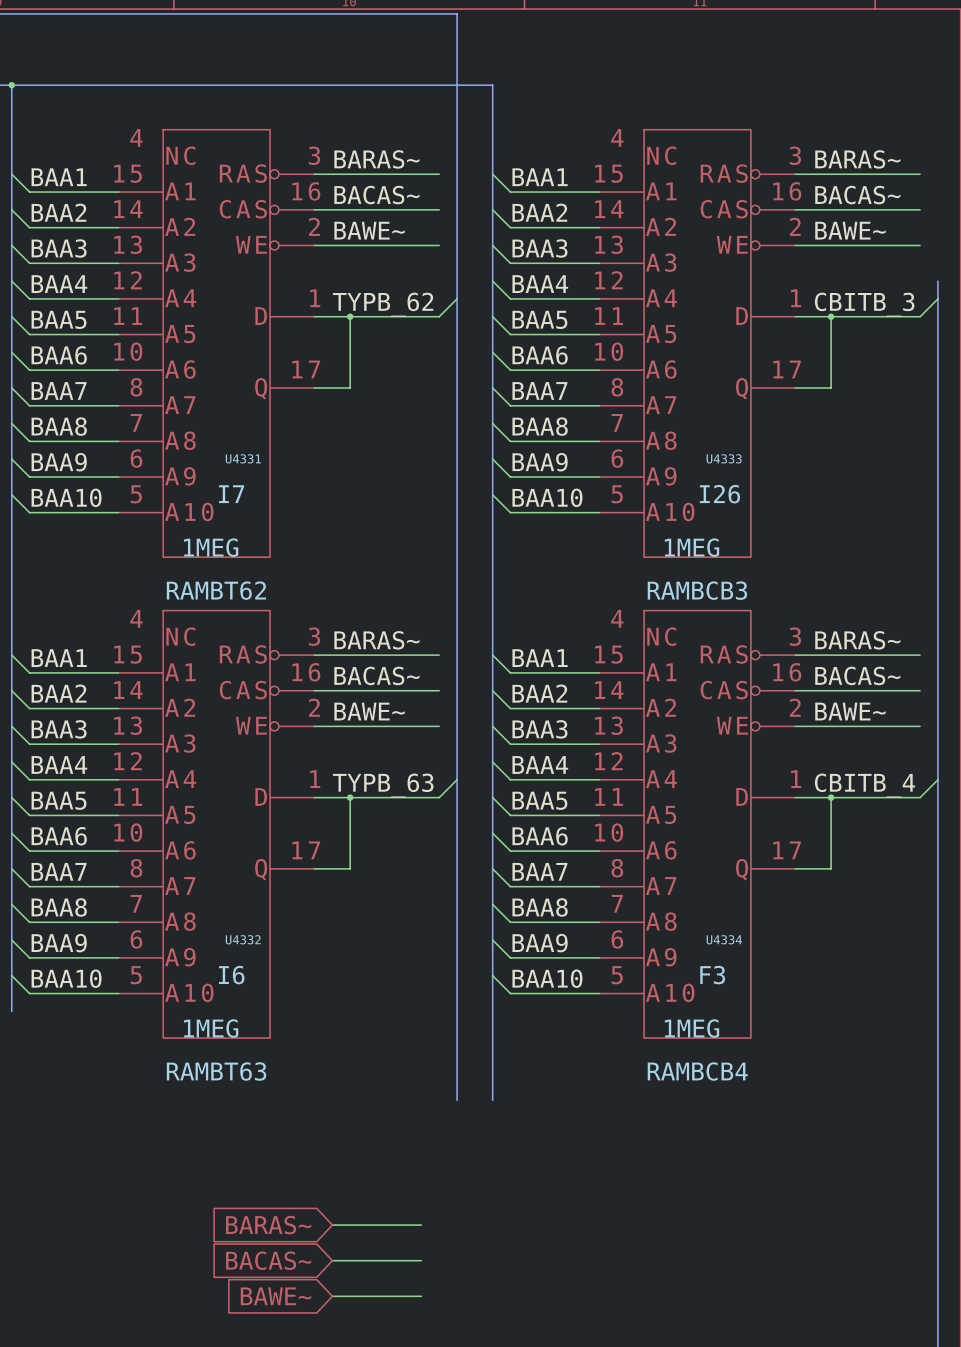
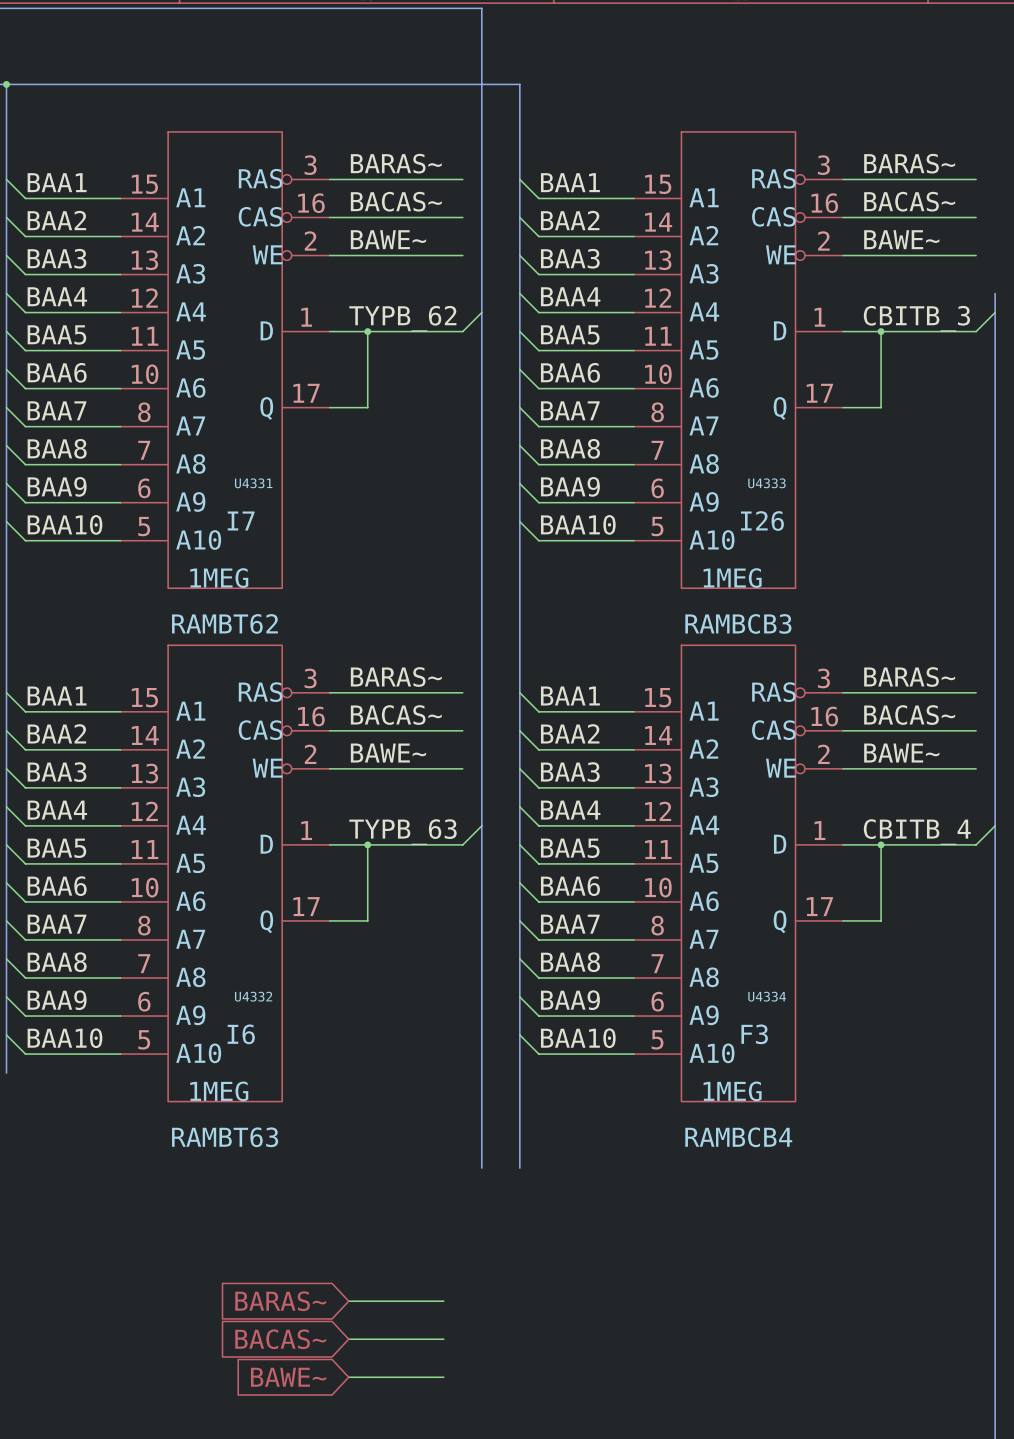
U4331 symbol: [118, 129, 315, 558] -> [120, 131, 330, 589]
U4333 symbol: [599, 129, 796, 558] -> [633, 131, 844, 589]
U4332 symbol: [118, 610, 315, 1039] -> [120, 645, 330, 1102]
U4334 symbol: [599, 610, 796, 1039] -> [633, 645, 844, 1102]

